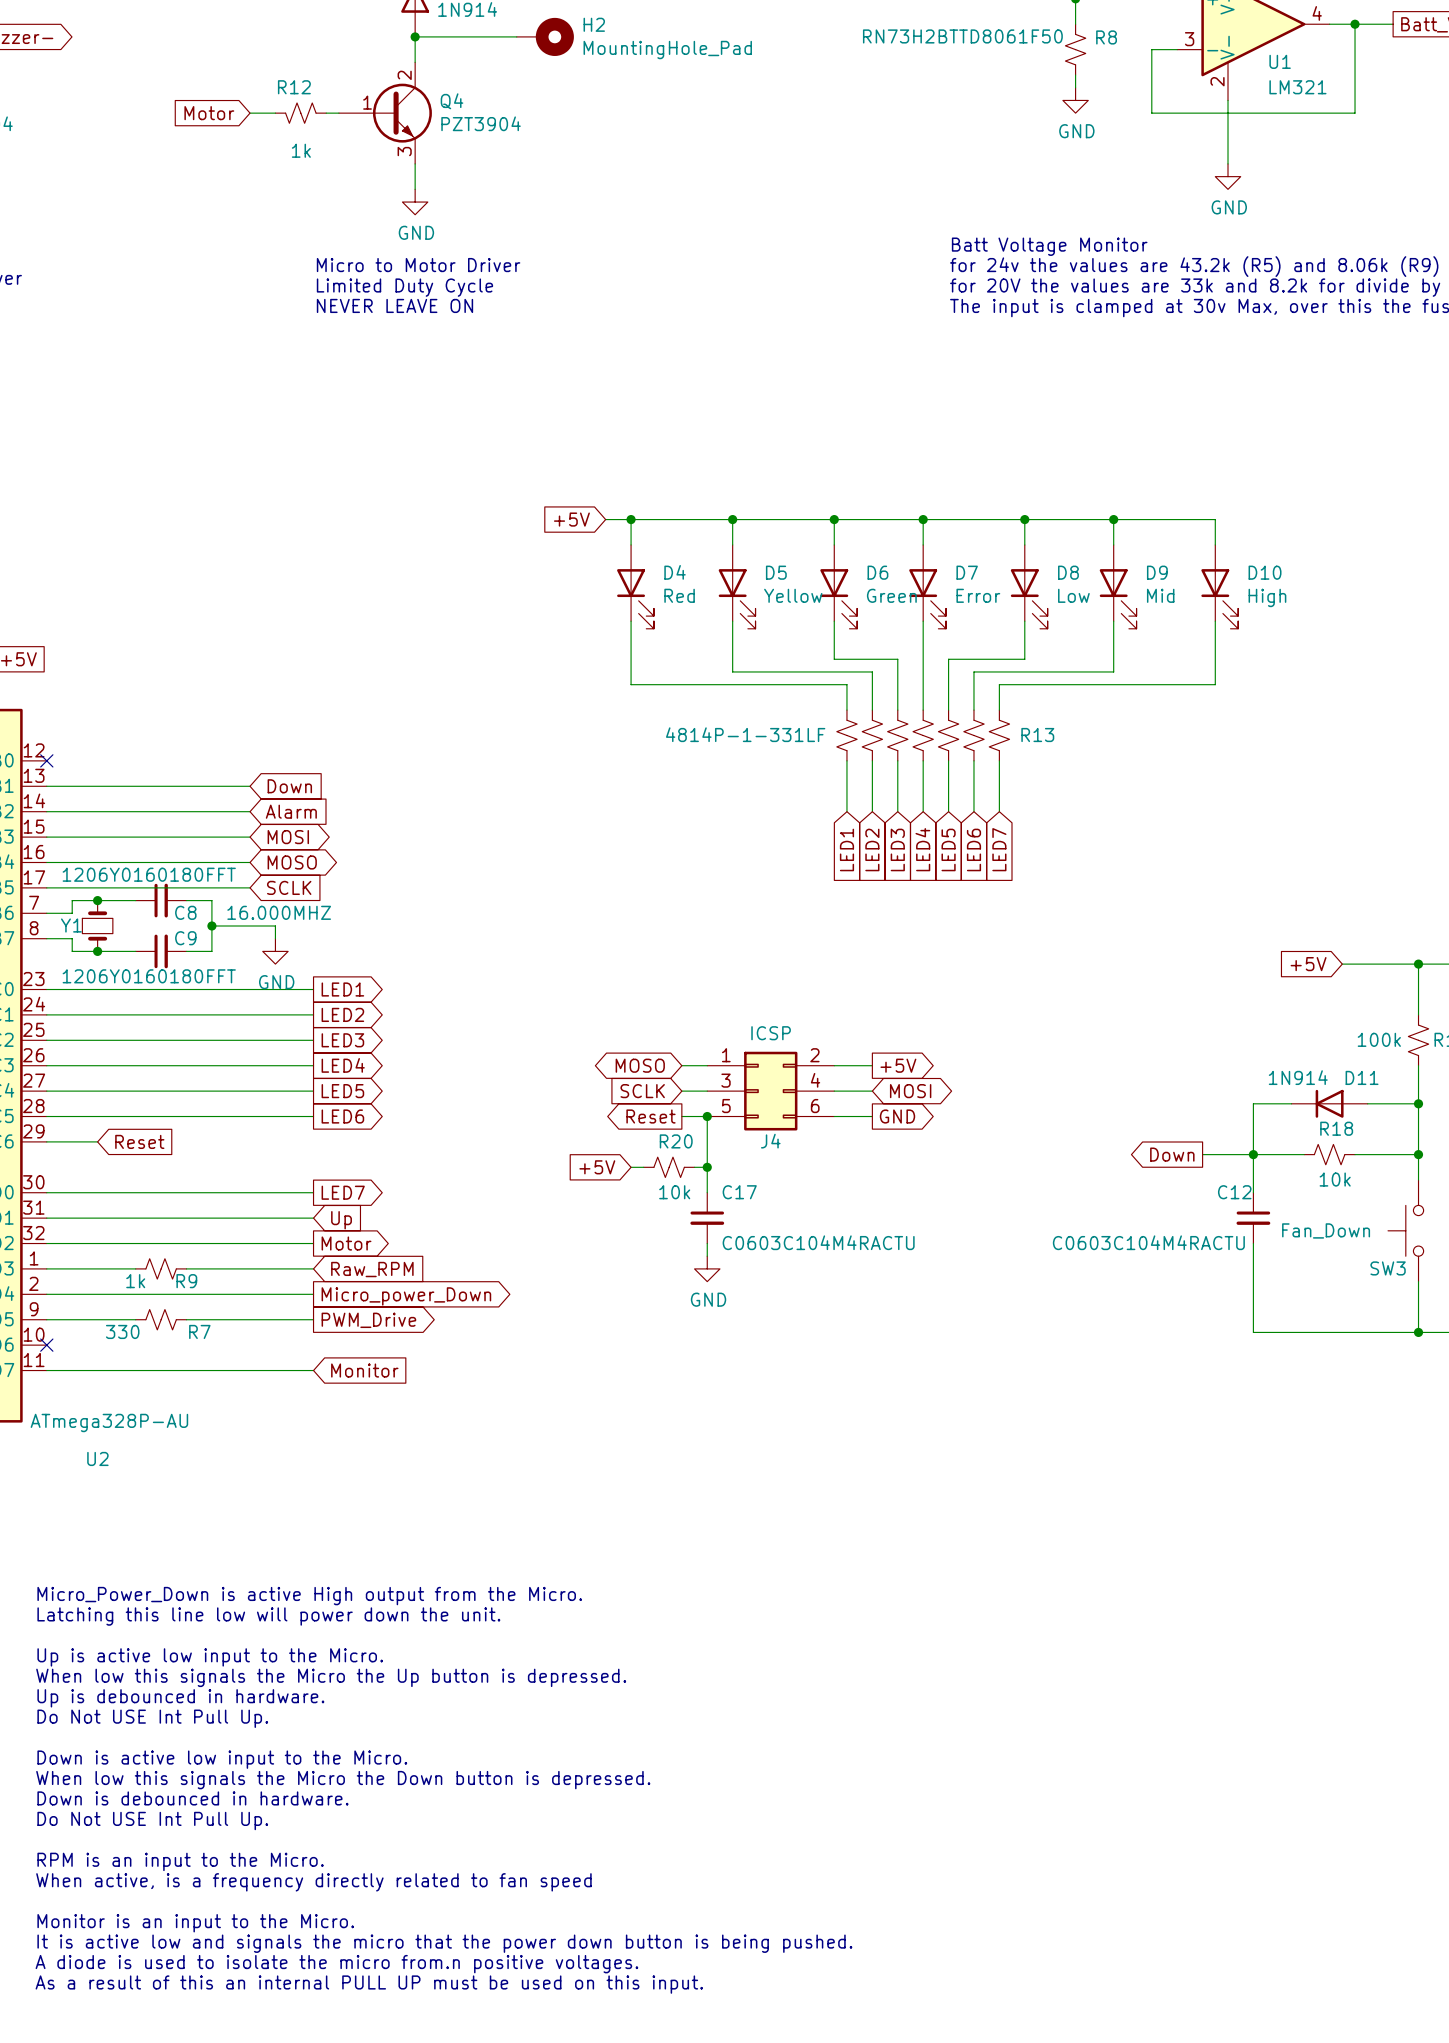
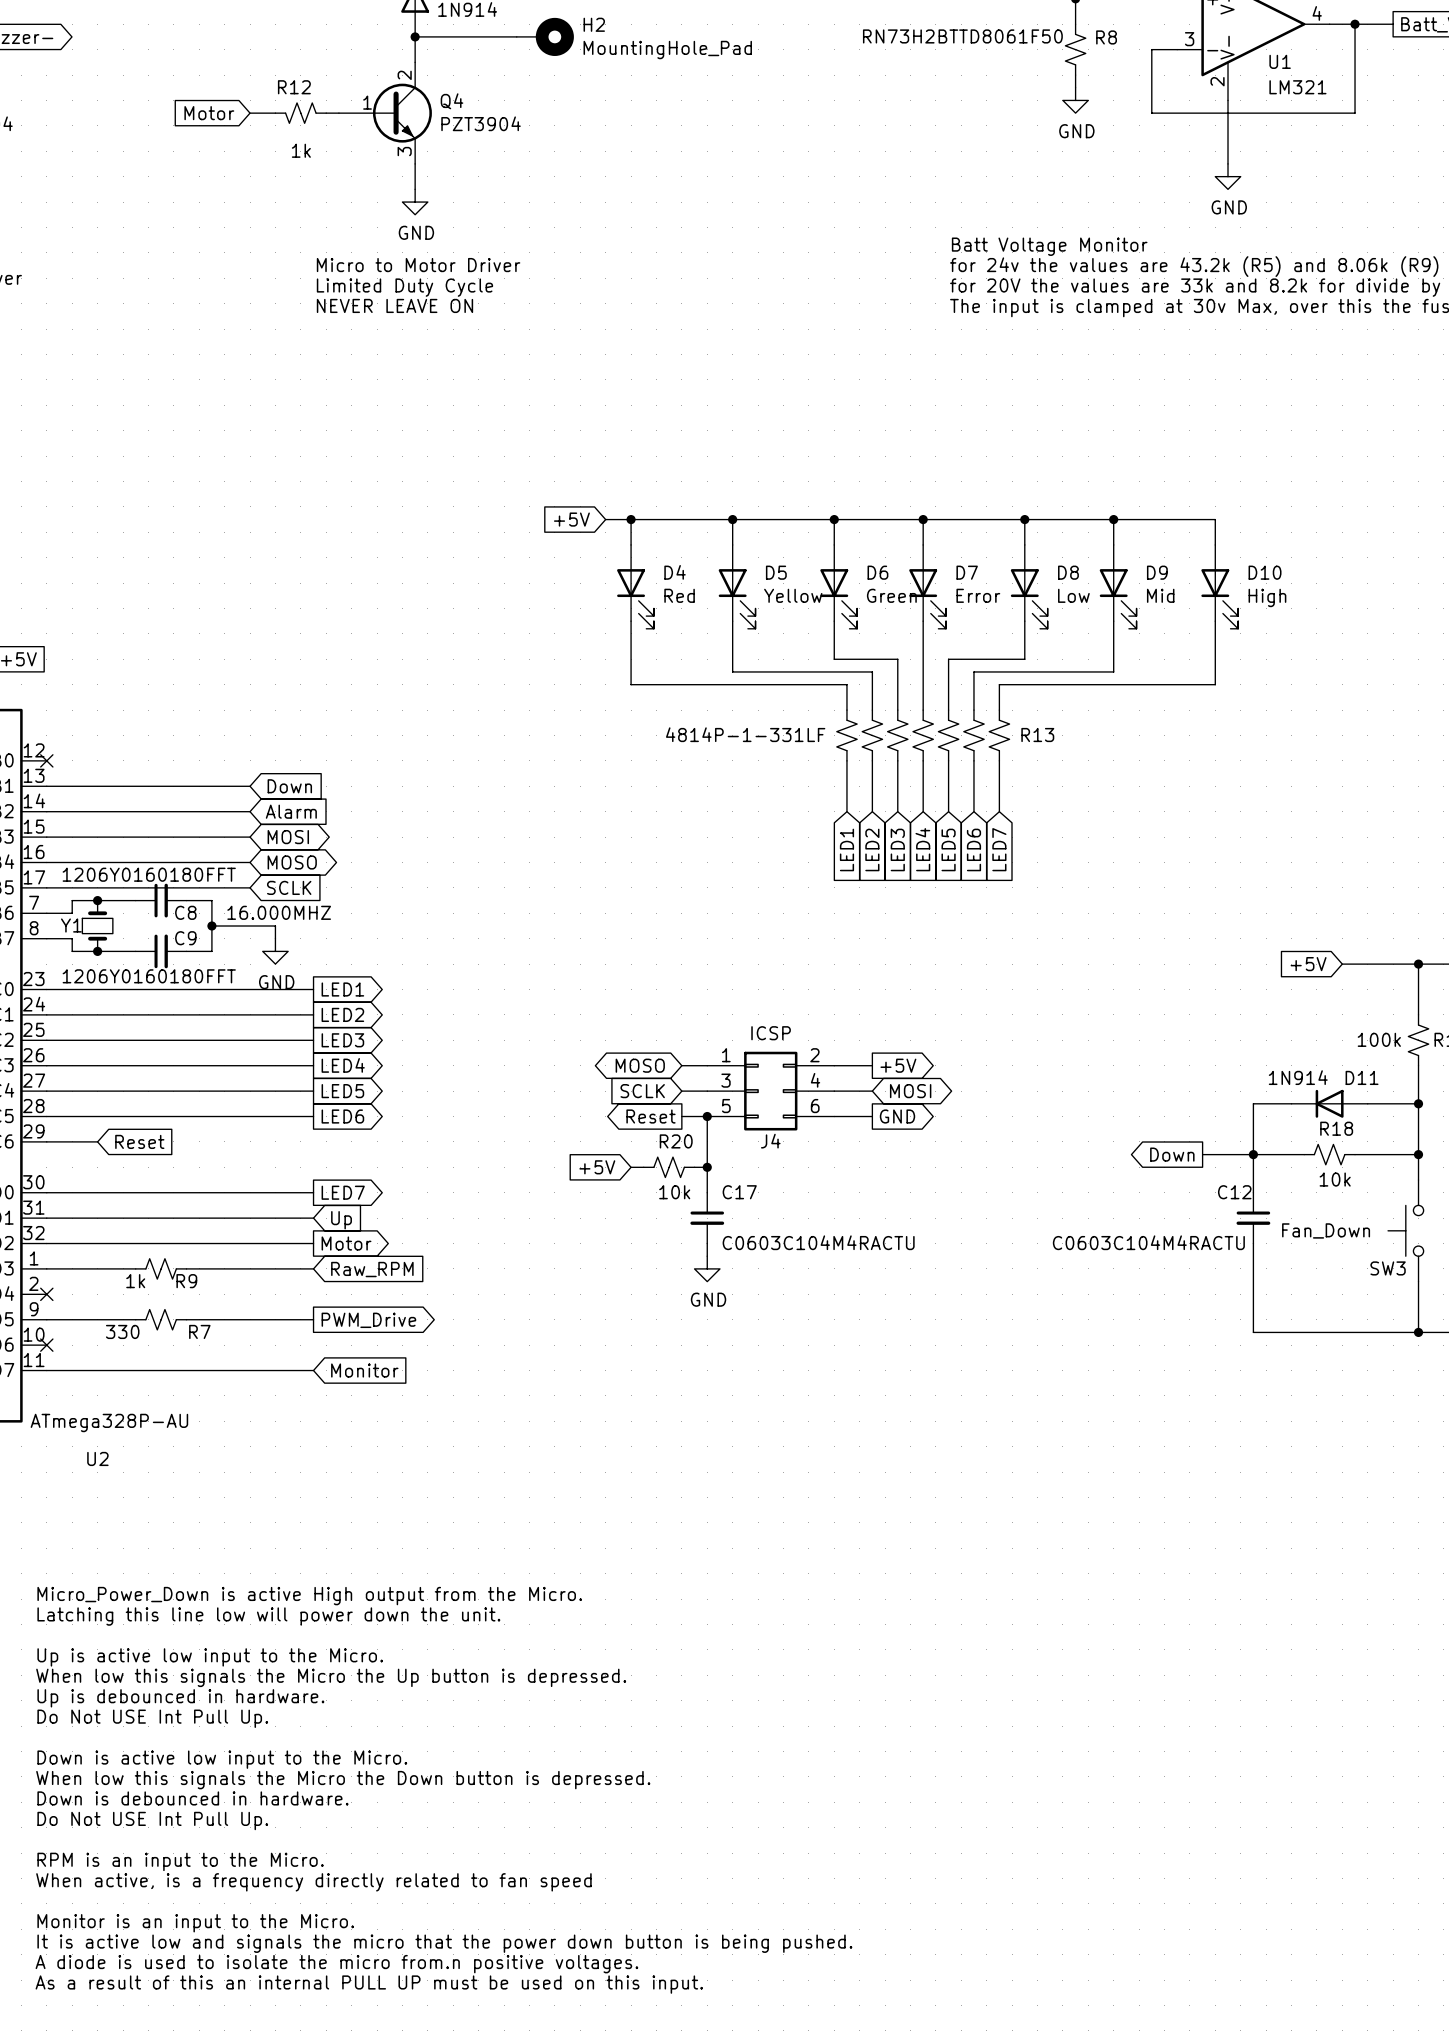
wire: (46, 1294) (313, 1294) -> none
no-connect mark: none -> (46, 1294)
global label: Micro_power_Down (406, 1296) -> none

